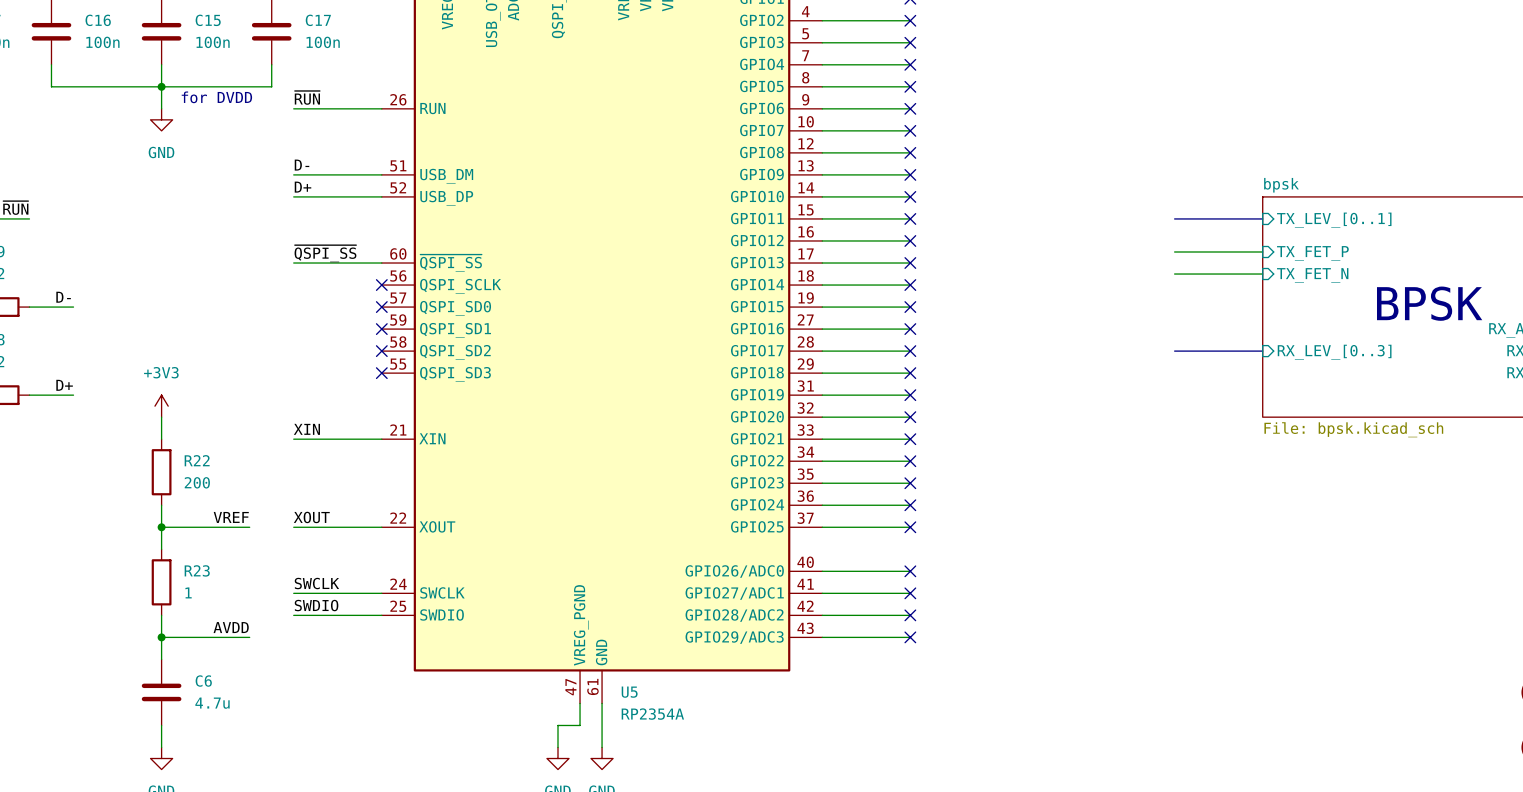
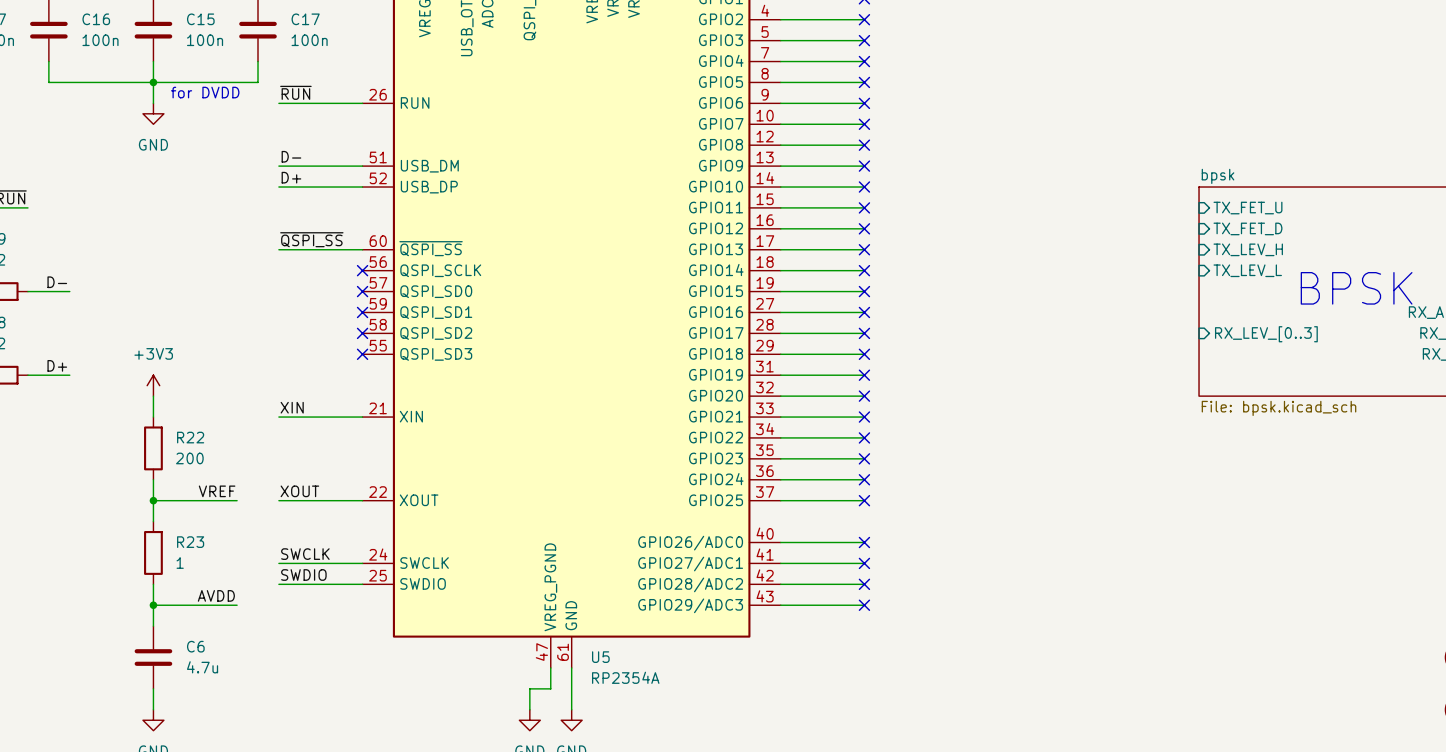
bus: (1174, 218) (1262, 218) -> none
sheet pin: TX_LEV_[0..1] (1334, 220) -> TX_FET_U (1247, 208)
sheet pin: none -> TX_FET_D (1247, 228)
wire: (1174, 252) (1262, 252) -> none
sheet pin: TX_FET_P (1312, 253) -> none
sheet pin: none -> TX_LEV_H (1248, 249)
wire: (1174, 274) (1262, 274) -> none
sheet pin: TX_FET_N (1312, 275) -> none
sheet pin: none -> TX_LEV_L (1247, 270)
bus: (1174, 351) (1262, 351) -> none

